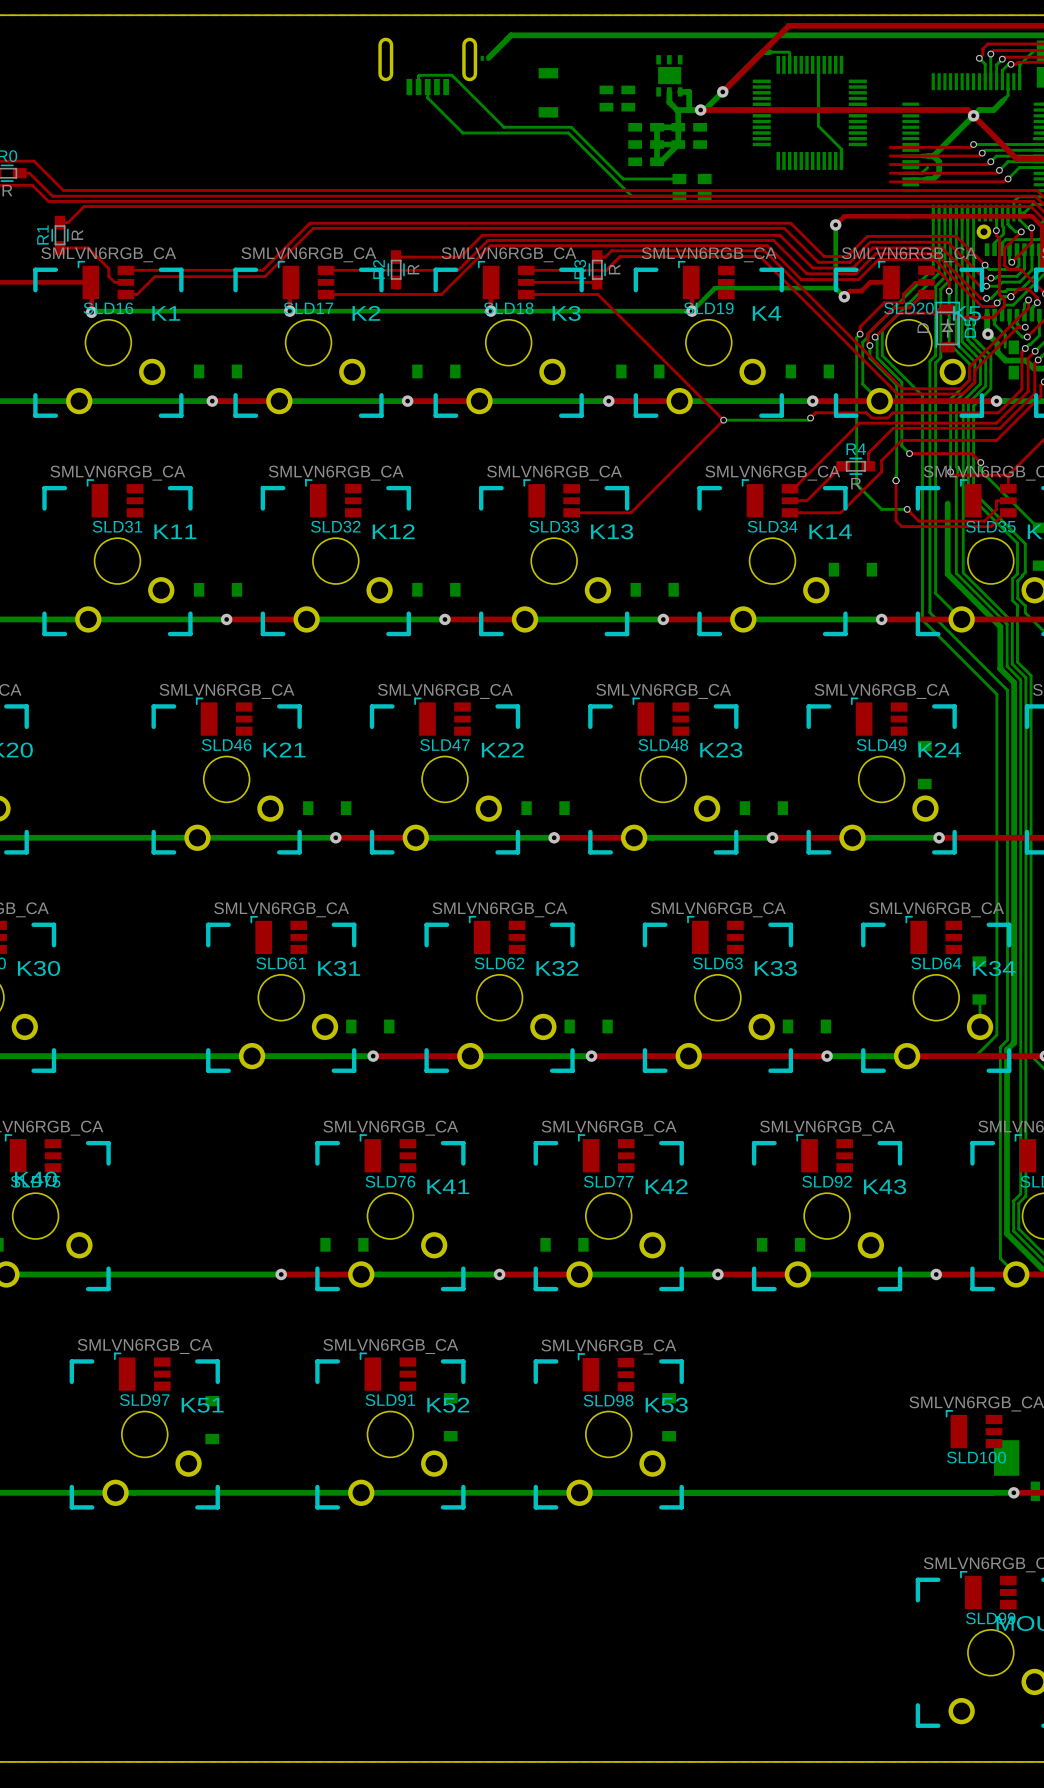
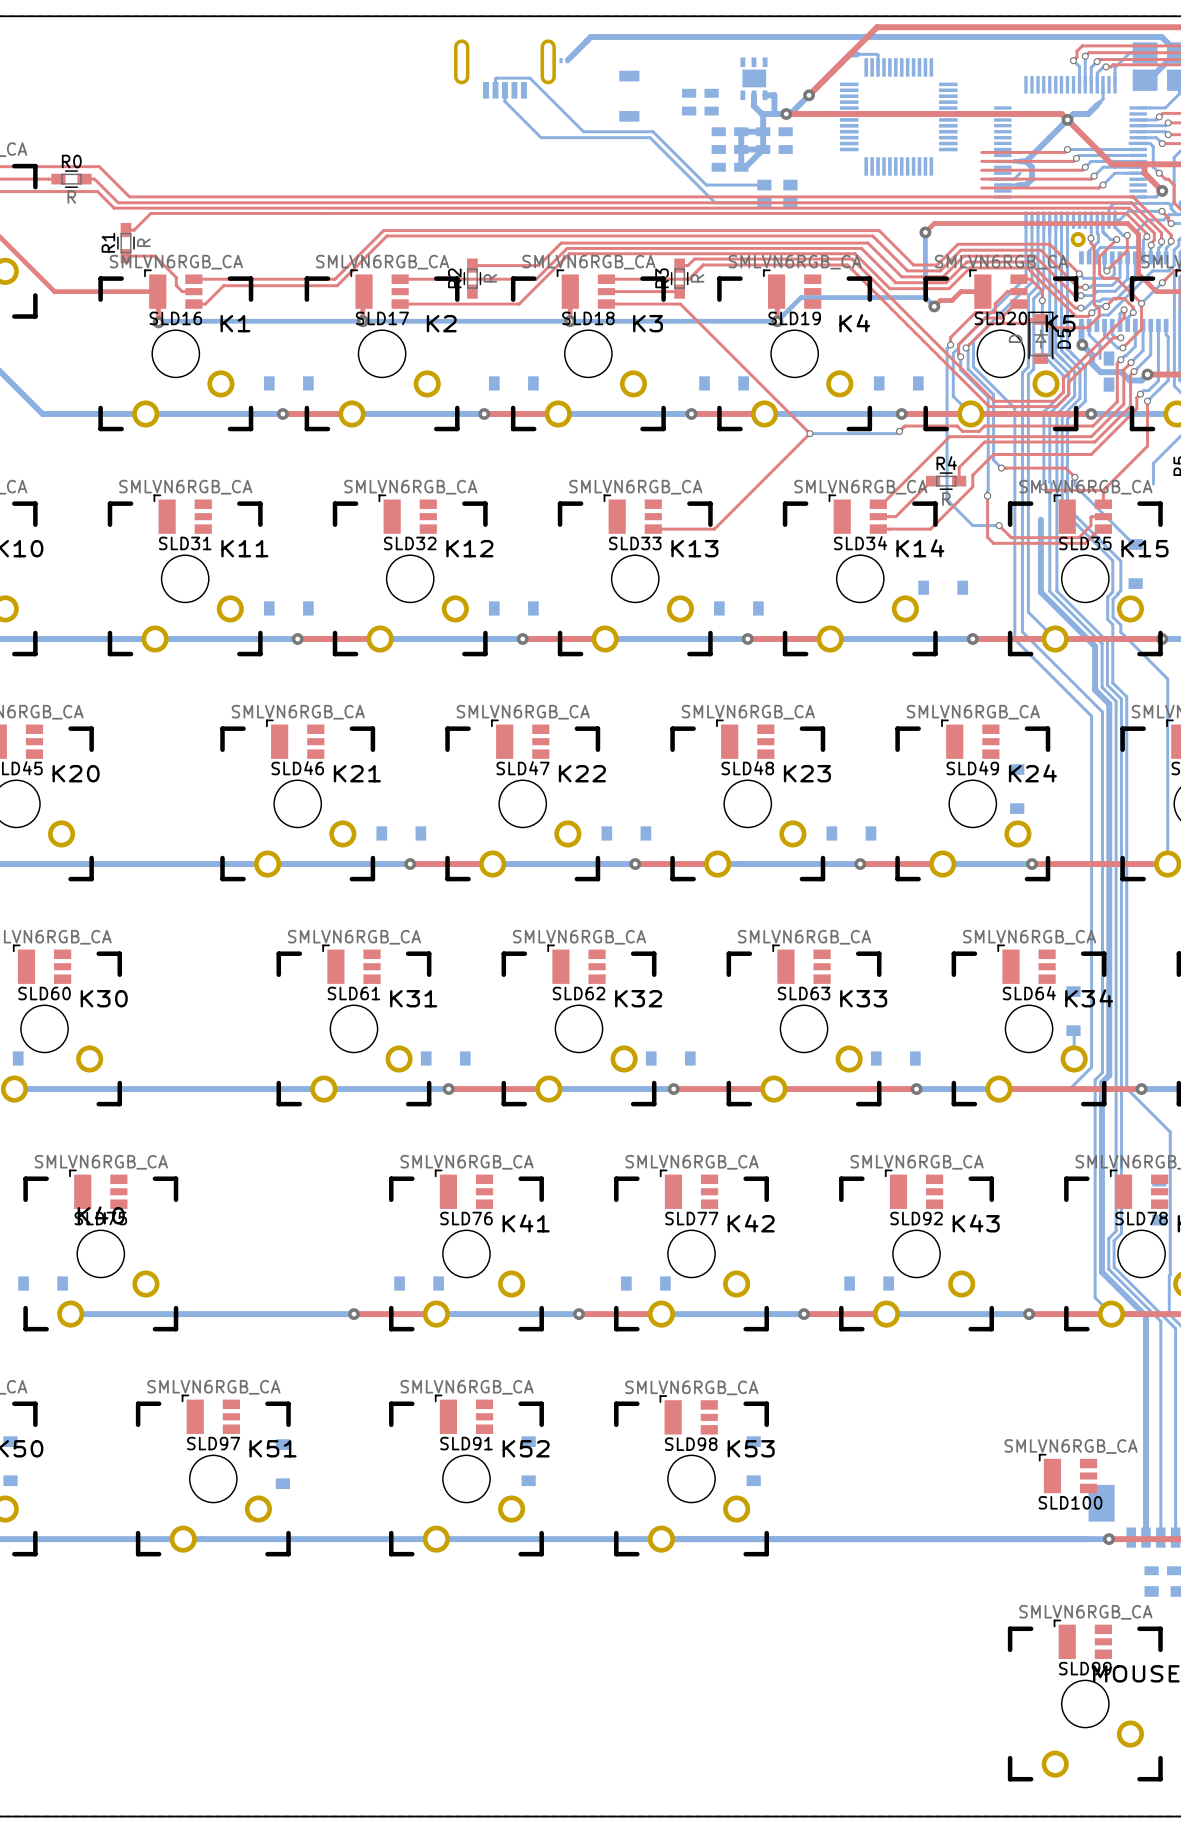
bottom track: (818, 64) (818, 126) (841, 149) (841, 160) -> none

